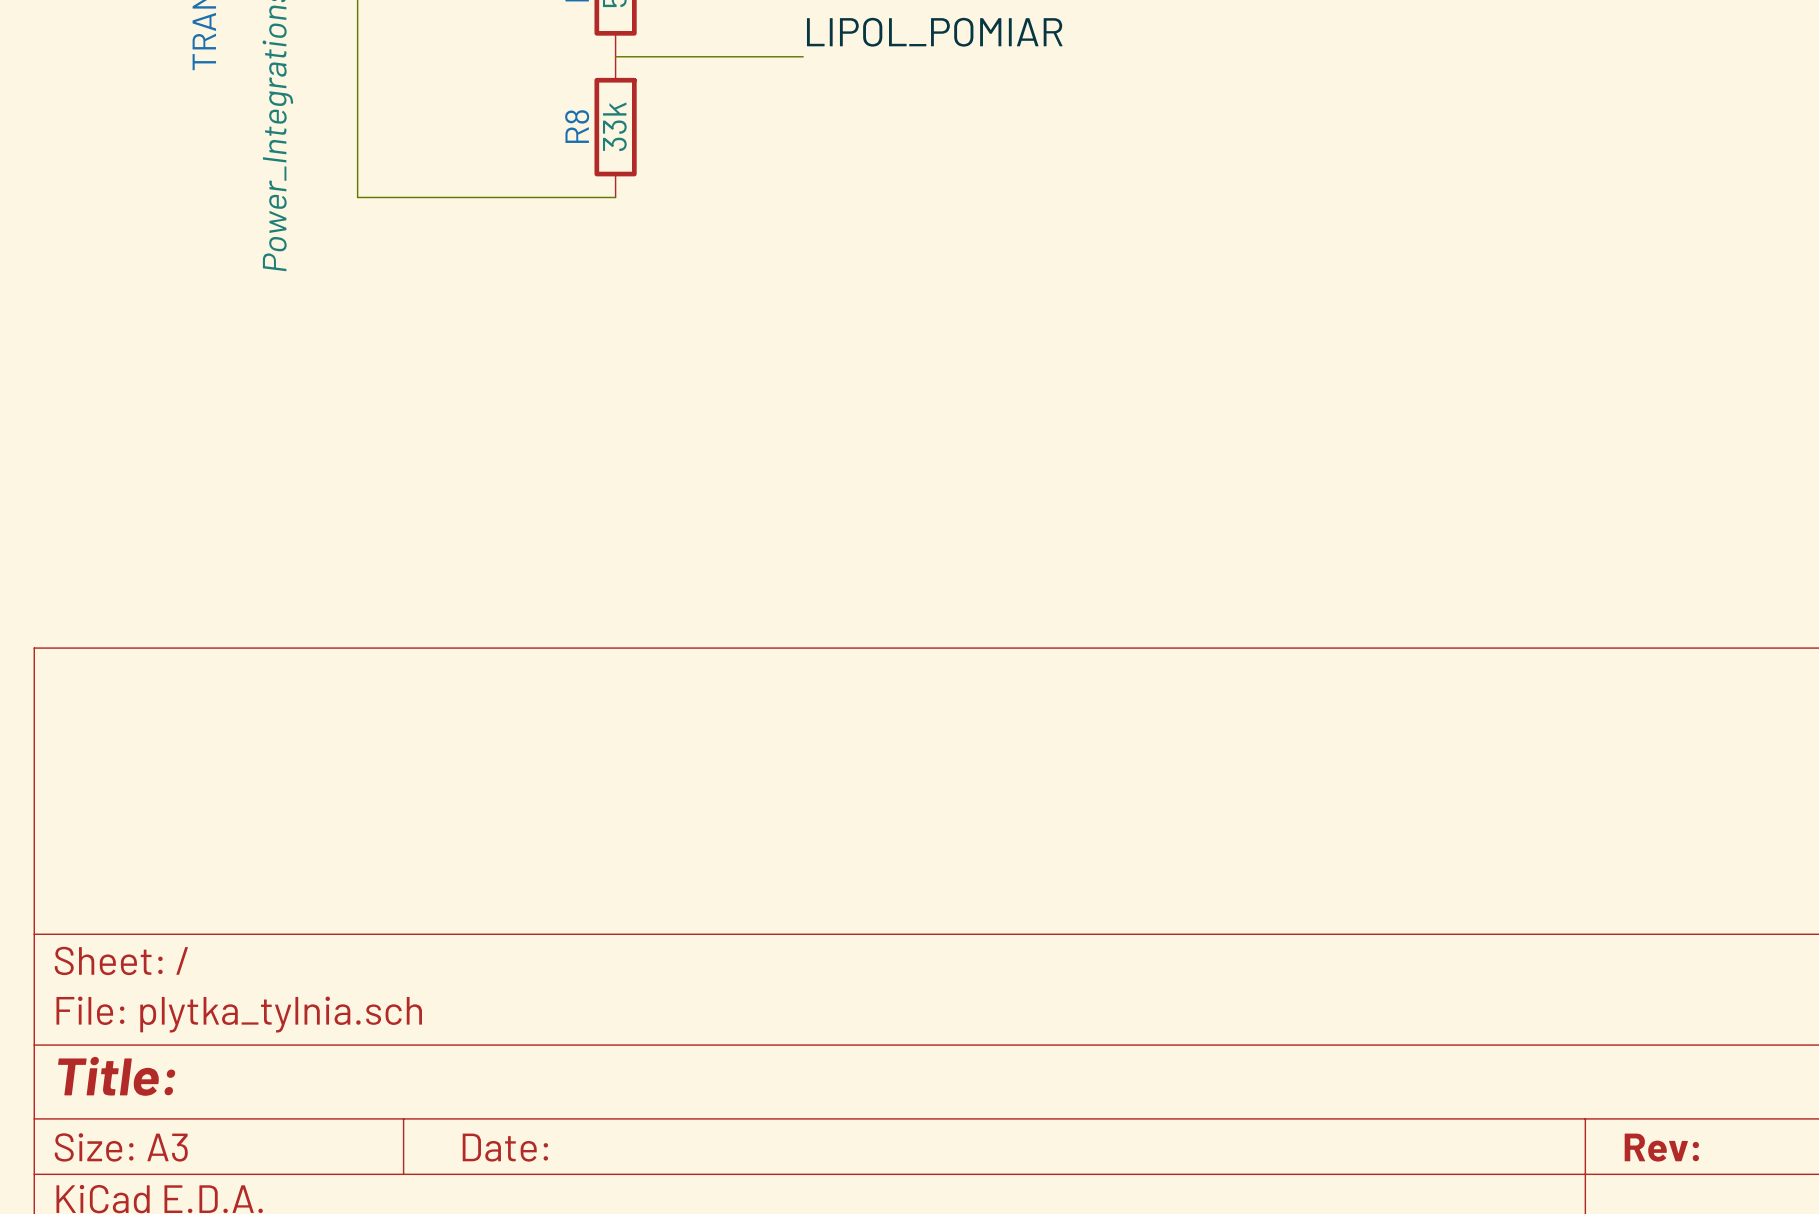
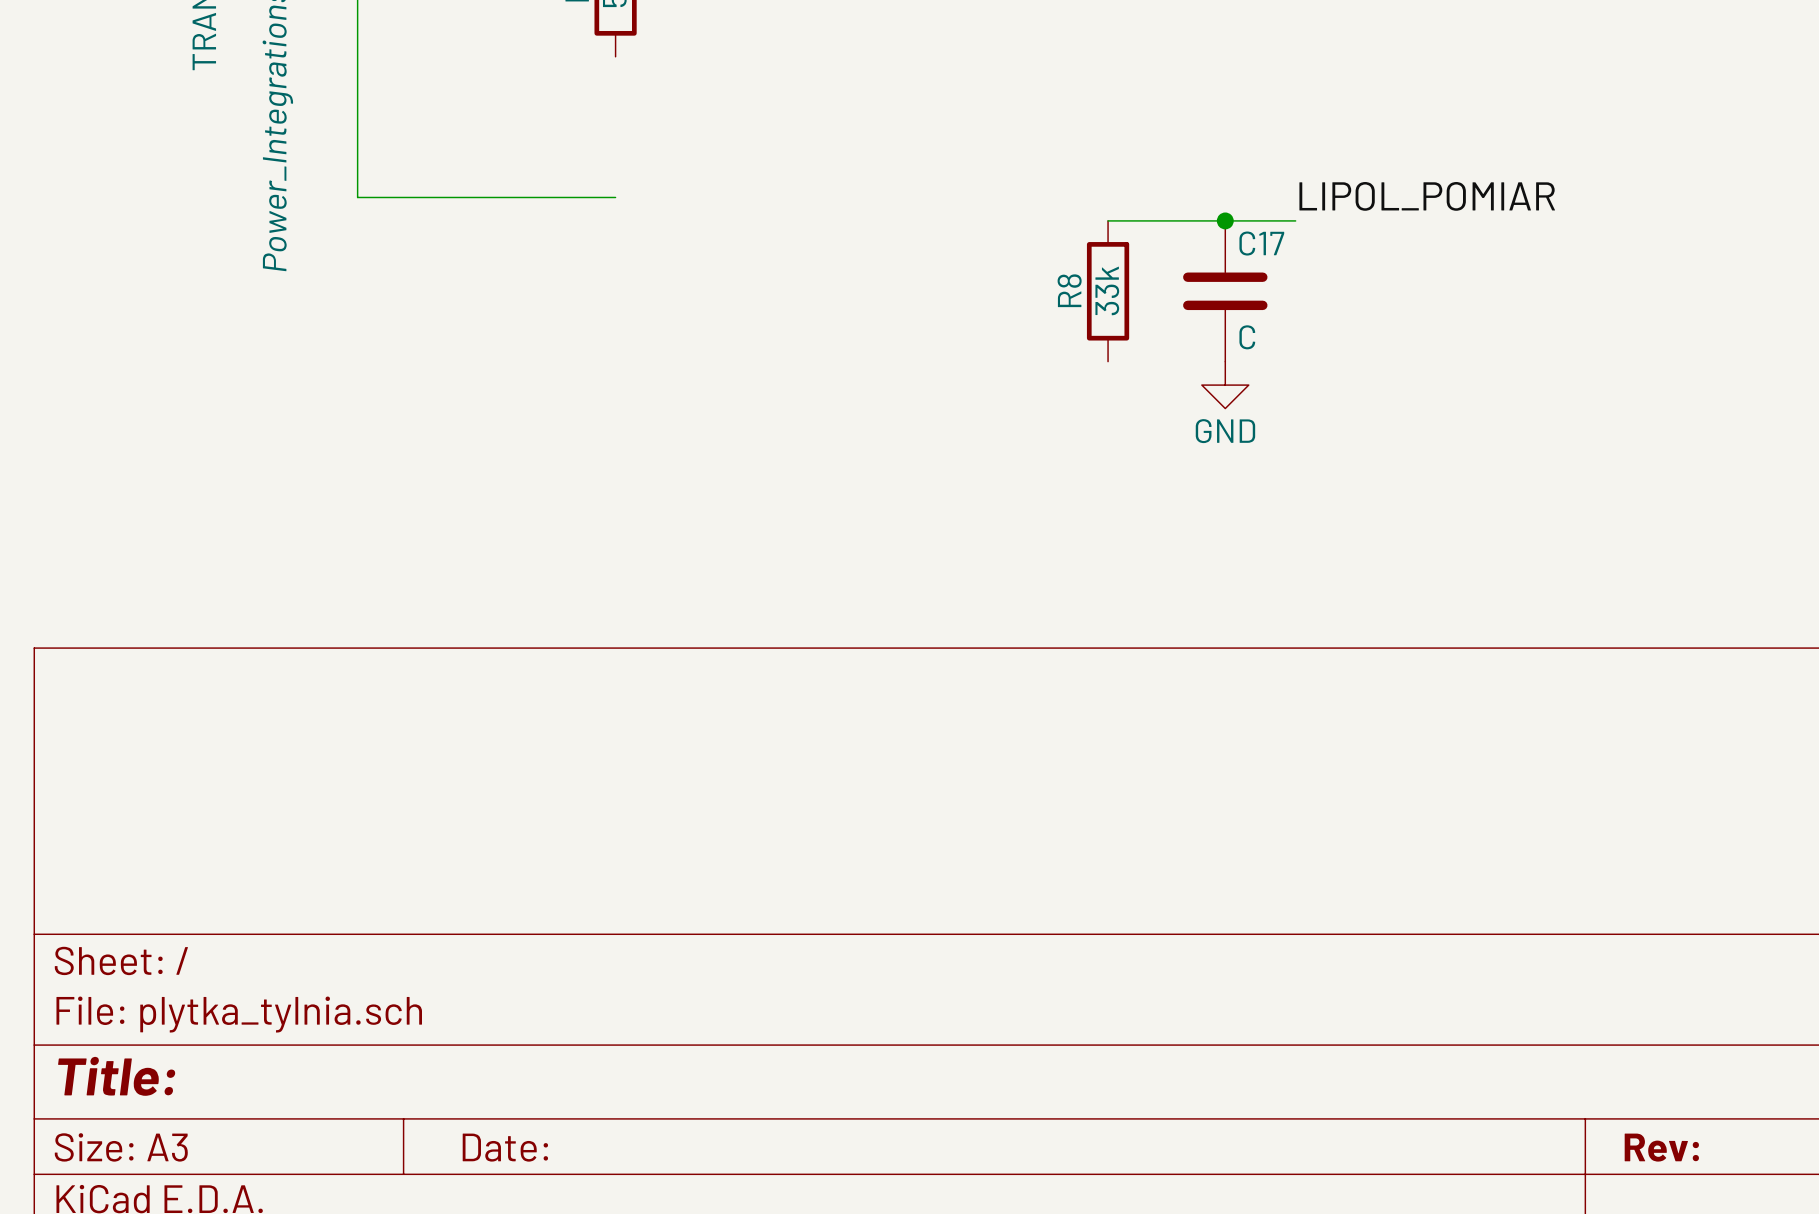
label: LIPOL_POMIAR (934, 32) -> none
wire: (615, 56) (803, 56) -> none
R8 position: (615, 127) -> (1108, 291)
label: none -> LIPOL_POMIAR (1427, 196)
wire: none -> (1108, 220) (1295, 220)
junction: none -> (1225, 220)
C17: none -> C (1225, 291)
power symbol: none -> GND (1225, 385)

